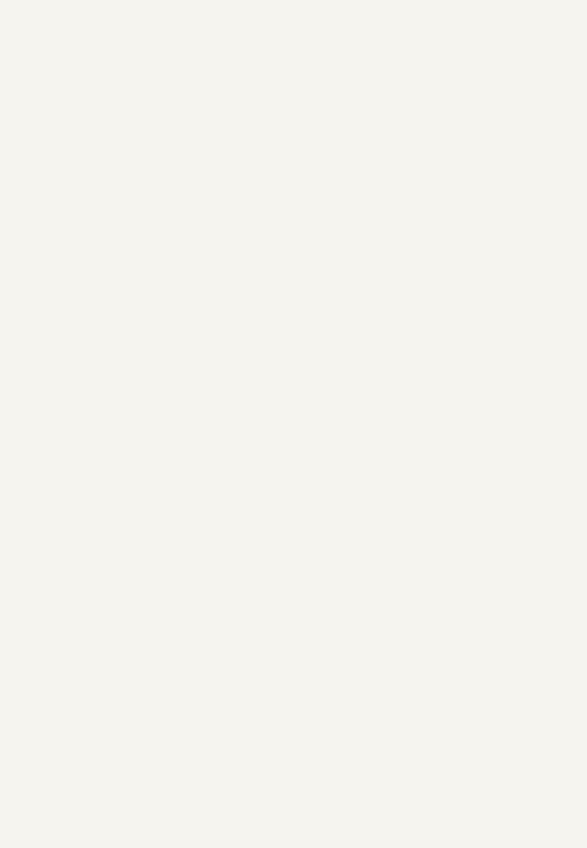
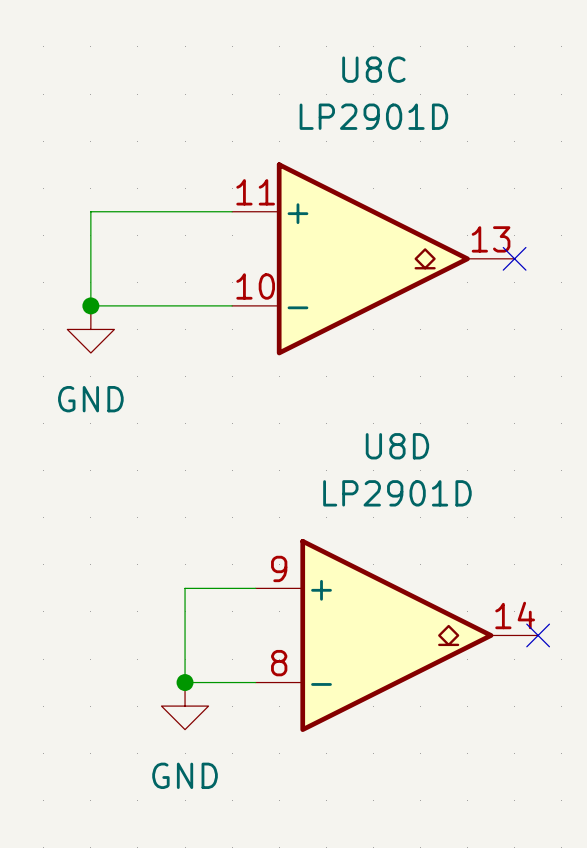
wire: none -> (232, 211) (90, 211) (90, 305) (232, 305)
U8C: none -> LP2901D (373, 258)
no-connect mark: none -> (514, 258)
junction: none -> (90, 305)
power symbol: none -> GND (90, 329)
wire: none -> (255, 588) (185, 588) (185, 682) (255, 682)
U8D: none -> LP2901D (396, 635)
no-connect mark: none -> (538, 635)
junction: none -> (185, 682)
power symbol: none -> GND (185, 706)

